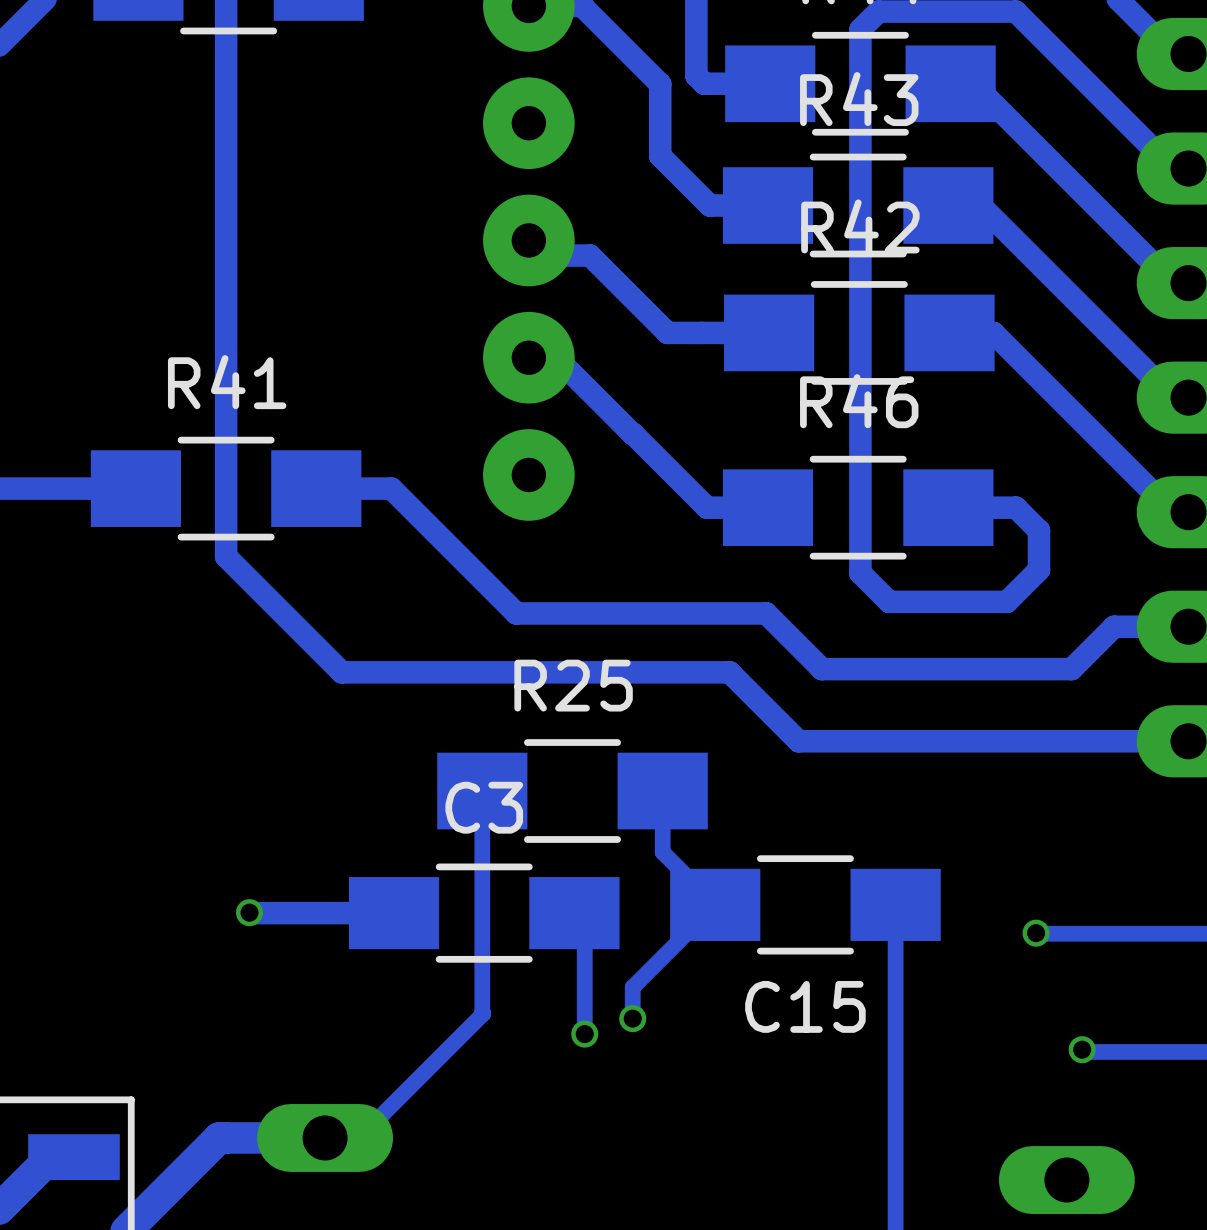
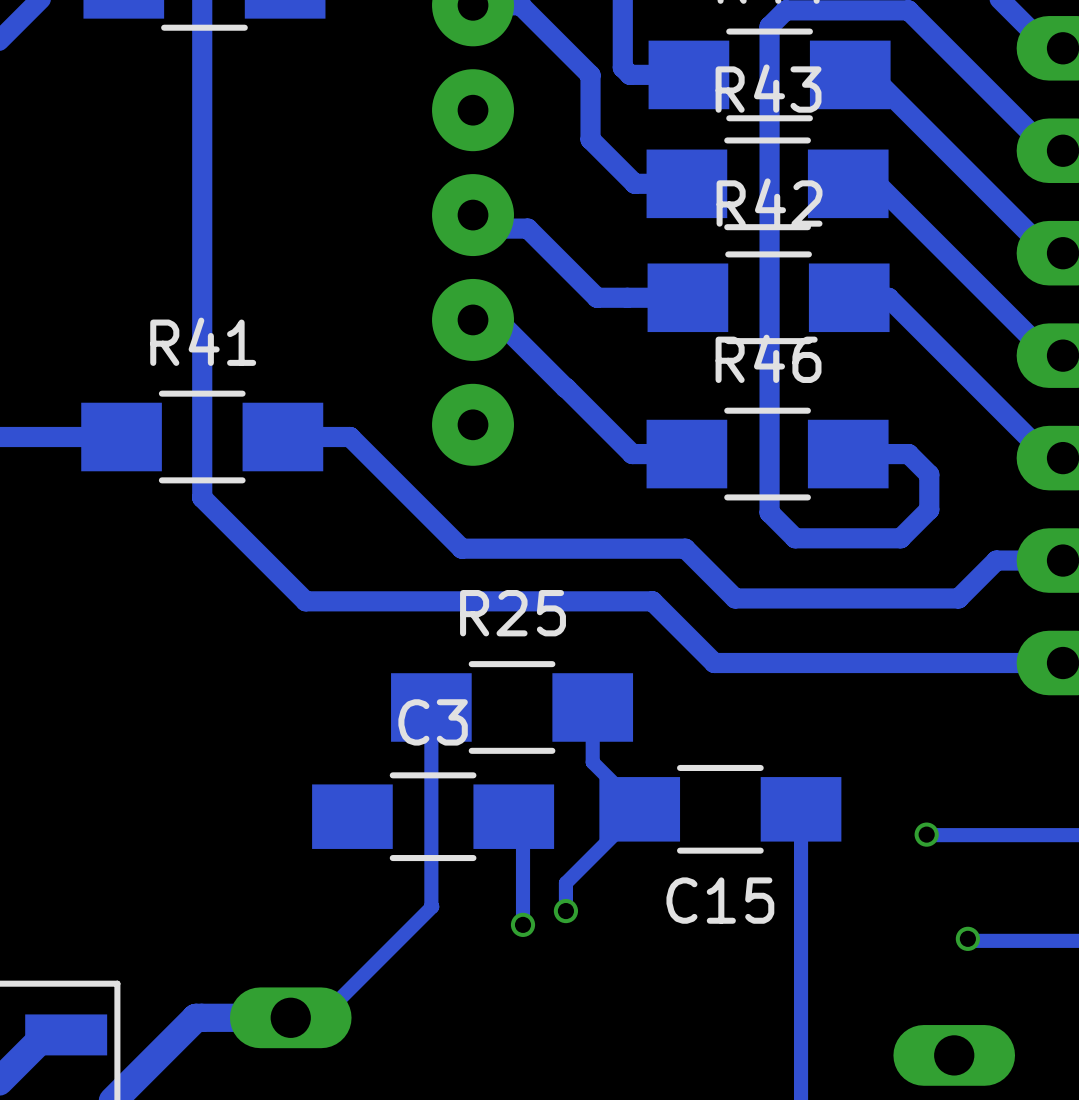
via: (249, 912) -> none
track: (394, 913) (249, 913) -> none

